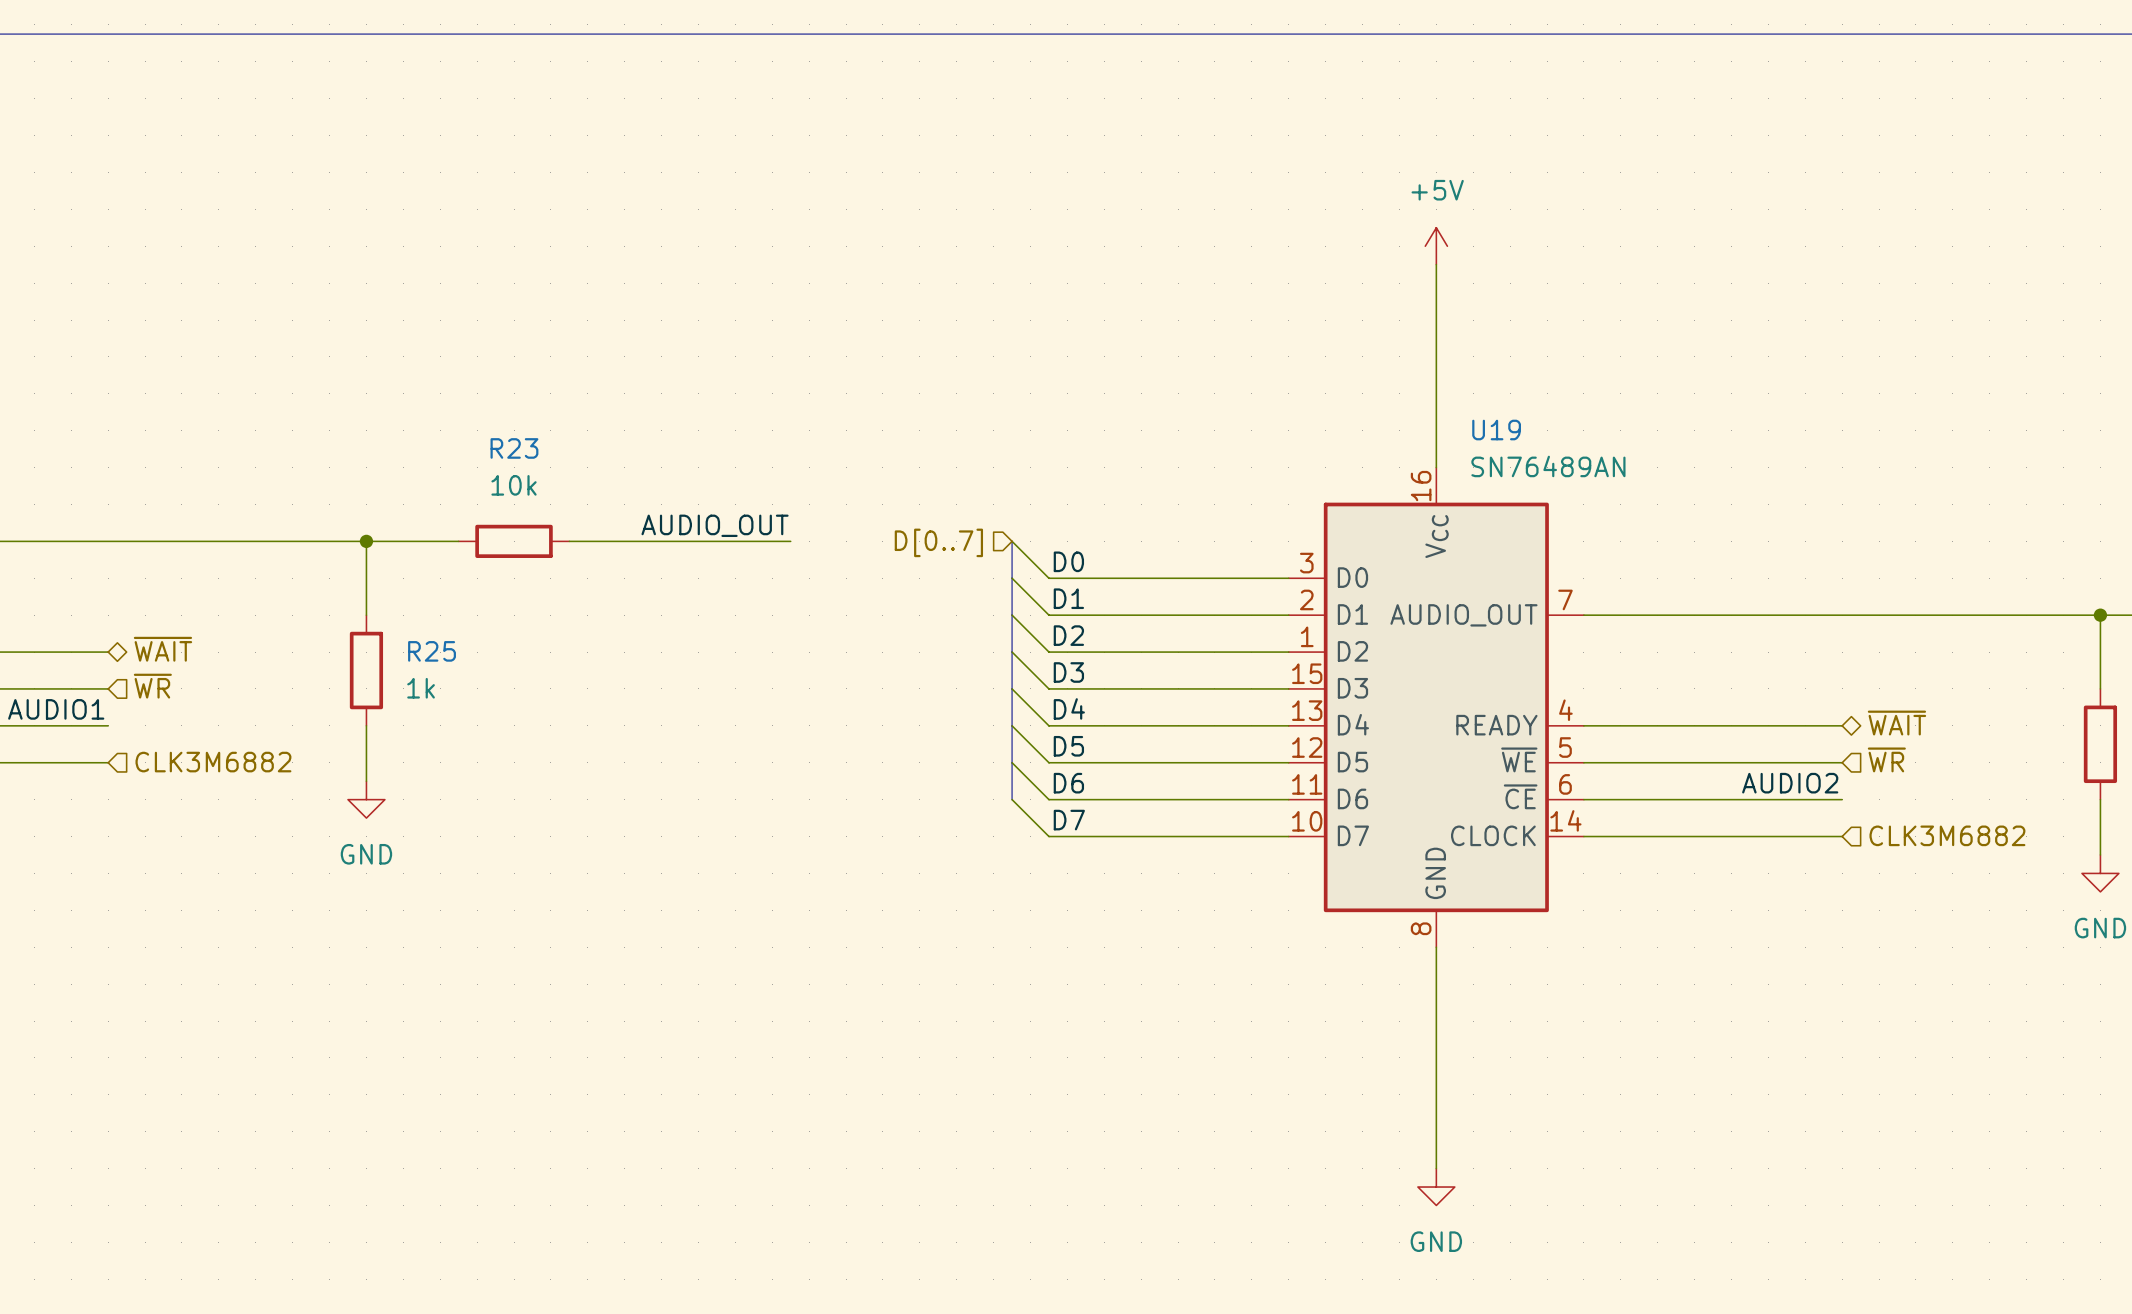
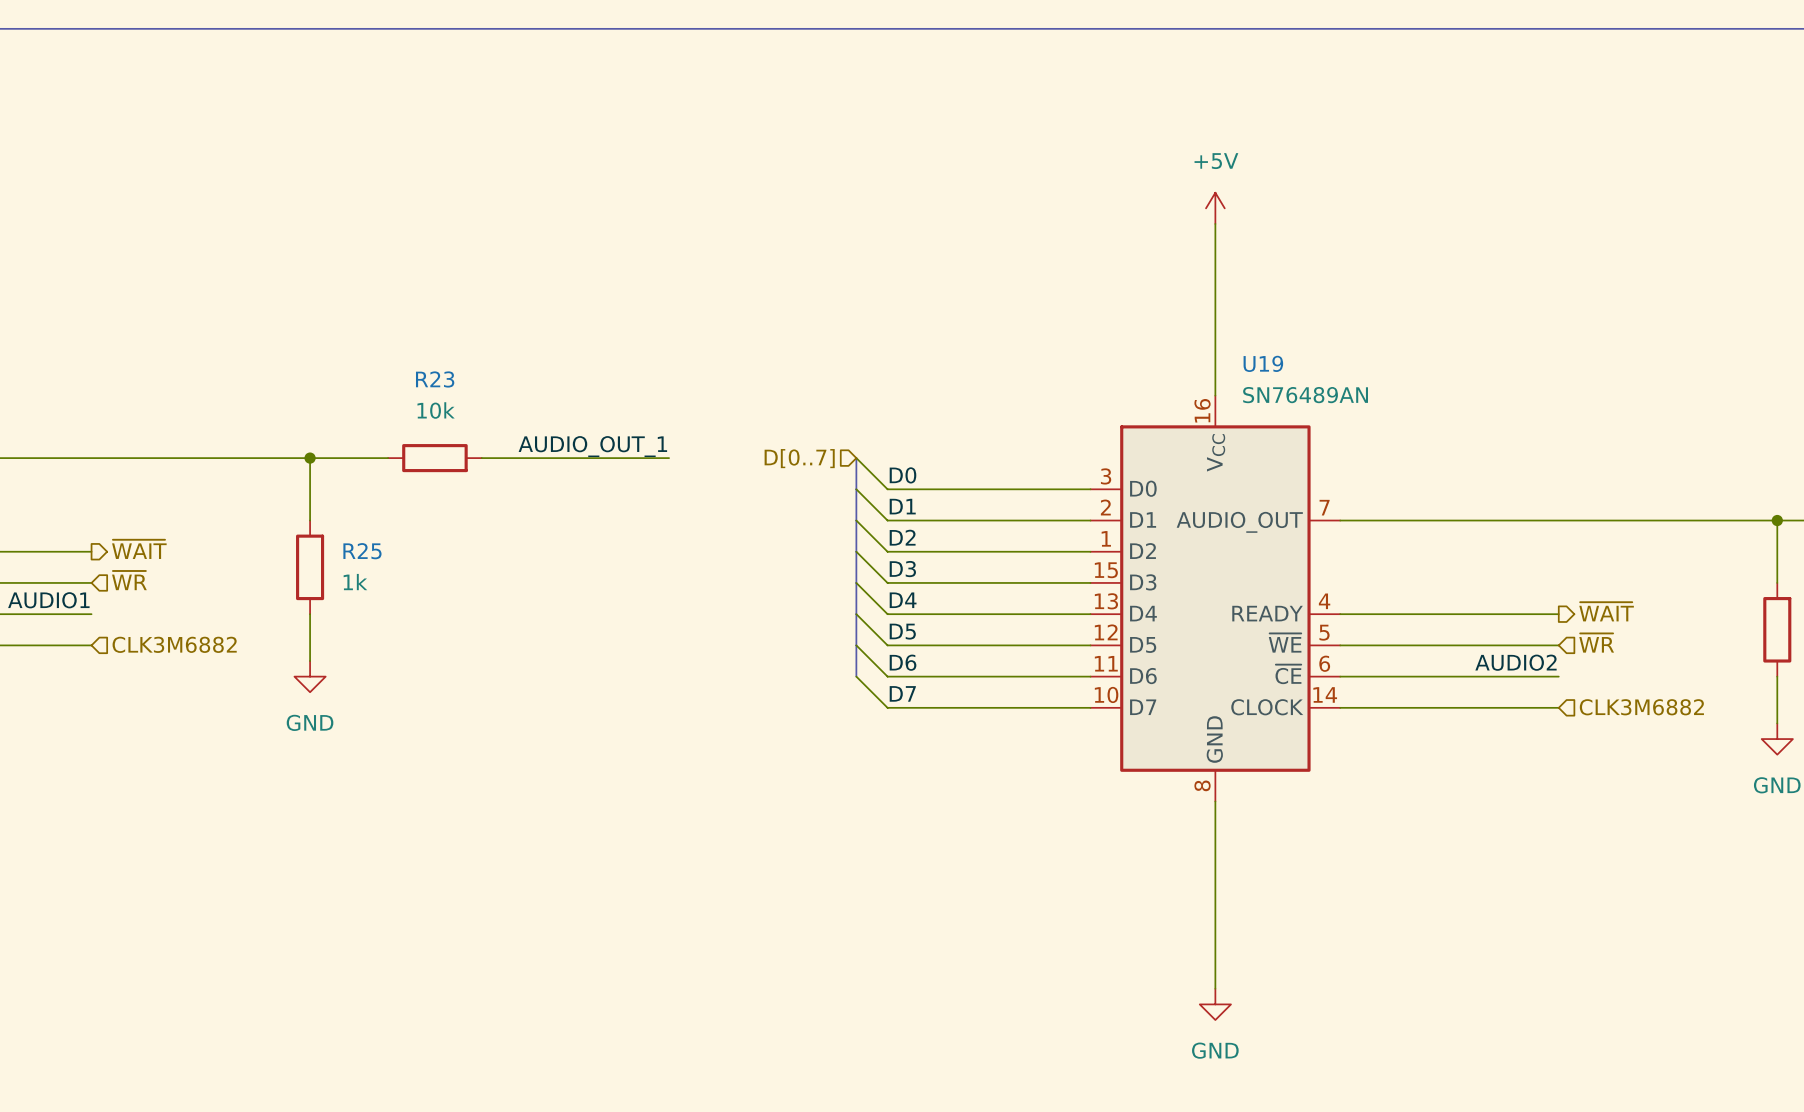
label: AUDIO_OUT (715, 525) -> AUDIO_OUT_1 (592, 446)
hierarchical label shape: bidirectional (162, 649) -> output (139, 549)
hierarchical label shape: bidirectional (1896, 723) -> output (1606, 611)

